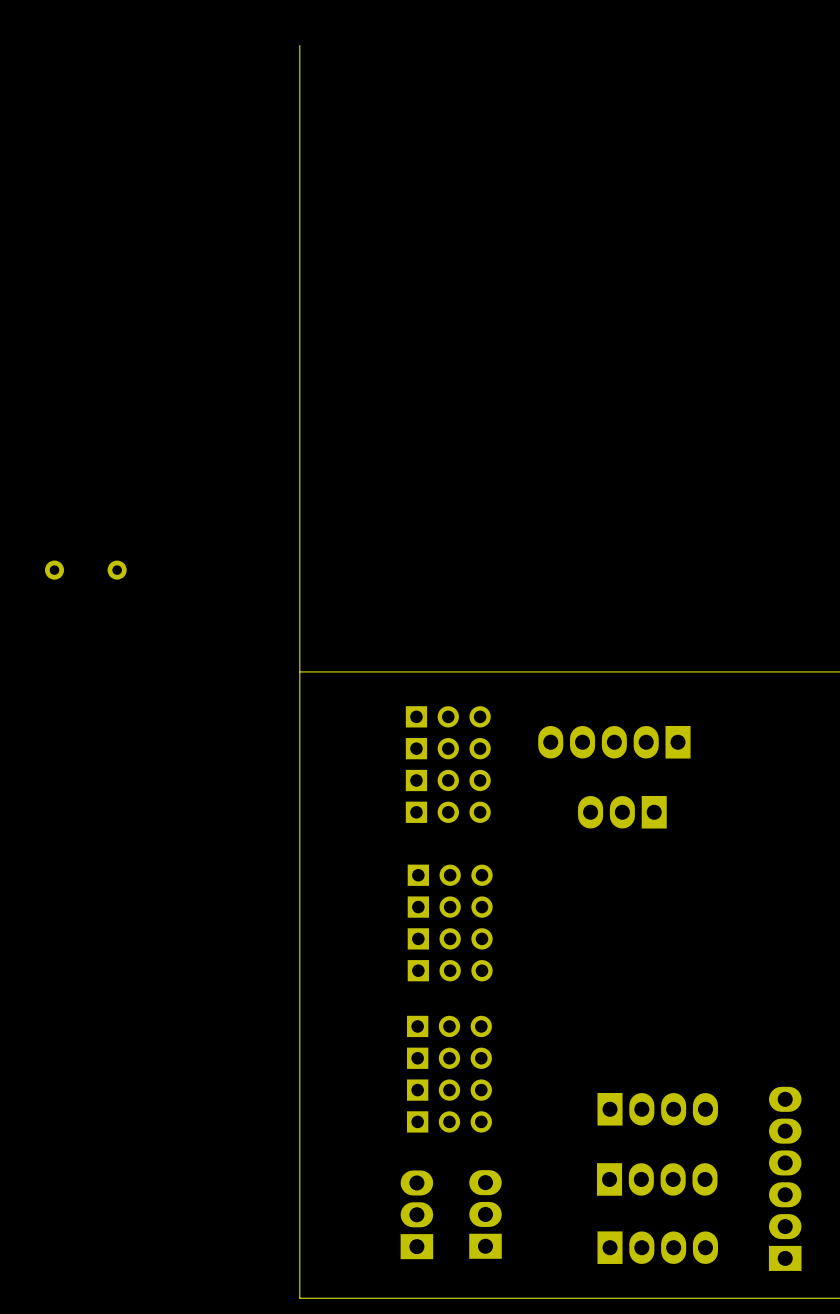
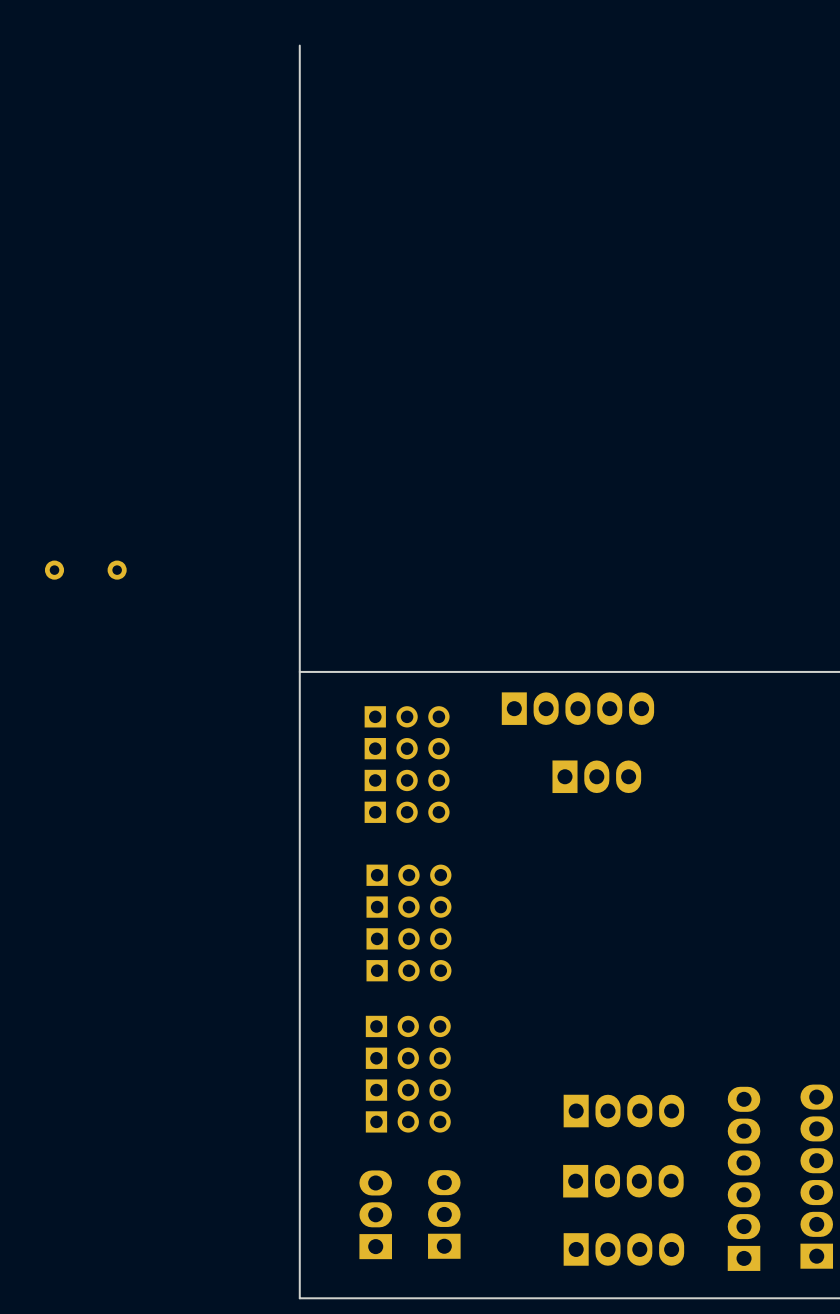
part: none -> (407, 716)
part: (448, 716) -> none
part rotation: 0° (614, 742) -> 180° (577, 708)
part: none -> (407, 748)
part: (448, 748) -> none
part: none -> (407, 780)
part: (448, 780) -> none
part: none -> (407, 812)
part: (448, 812) -> none
part rotation: 0° (622, 812) -> 180° (596, 776)
part: none -> (408, 875)
part: (450, 875) -> none
part: none -> (408, 907)
part: (450, 907) -> none
part: none -> (408, 938)
part: (450, 938) -> none
part: none -> (408, 970)
part: (450, 970) -> none
part: none -> (408, 1026)
part: (449, 1026) -> none
part: none -> (408, 1058)
part: (449, 1058) -> none
part: none -> (408, 1090)
part: (449, 1090) -> none
part position: (657, 1109) -> (623, 1111)
part: none -> (408, 1121)
part: (449, 1121) -> none
part: none -> (816, 1176)
part: none -> (744, 1178)
part: (785, 1178) -> none
part position: (657, 1179) -> (623, 1181)
part: none -> (375, 1214)
part: (416, 1214) -> none
part: none -> (444, 1214)
part: (485, 1214) -> none
part position: (657, 1247) -> (623, 1249)

